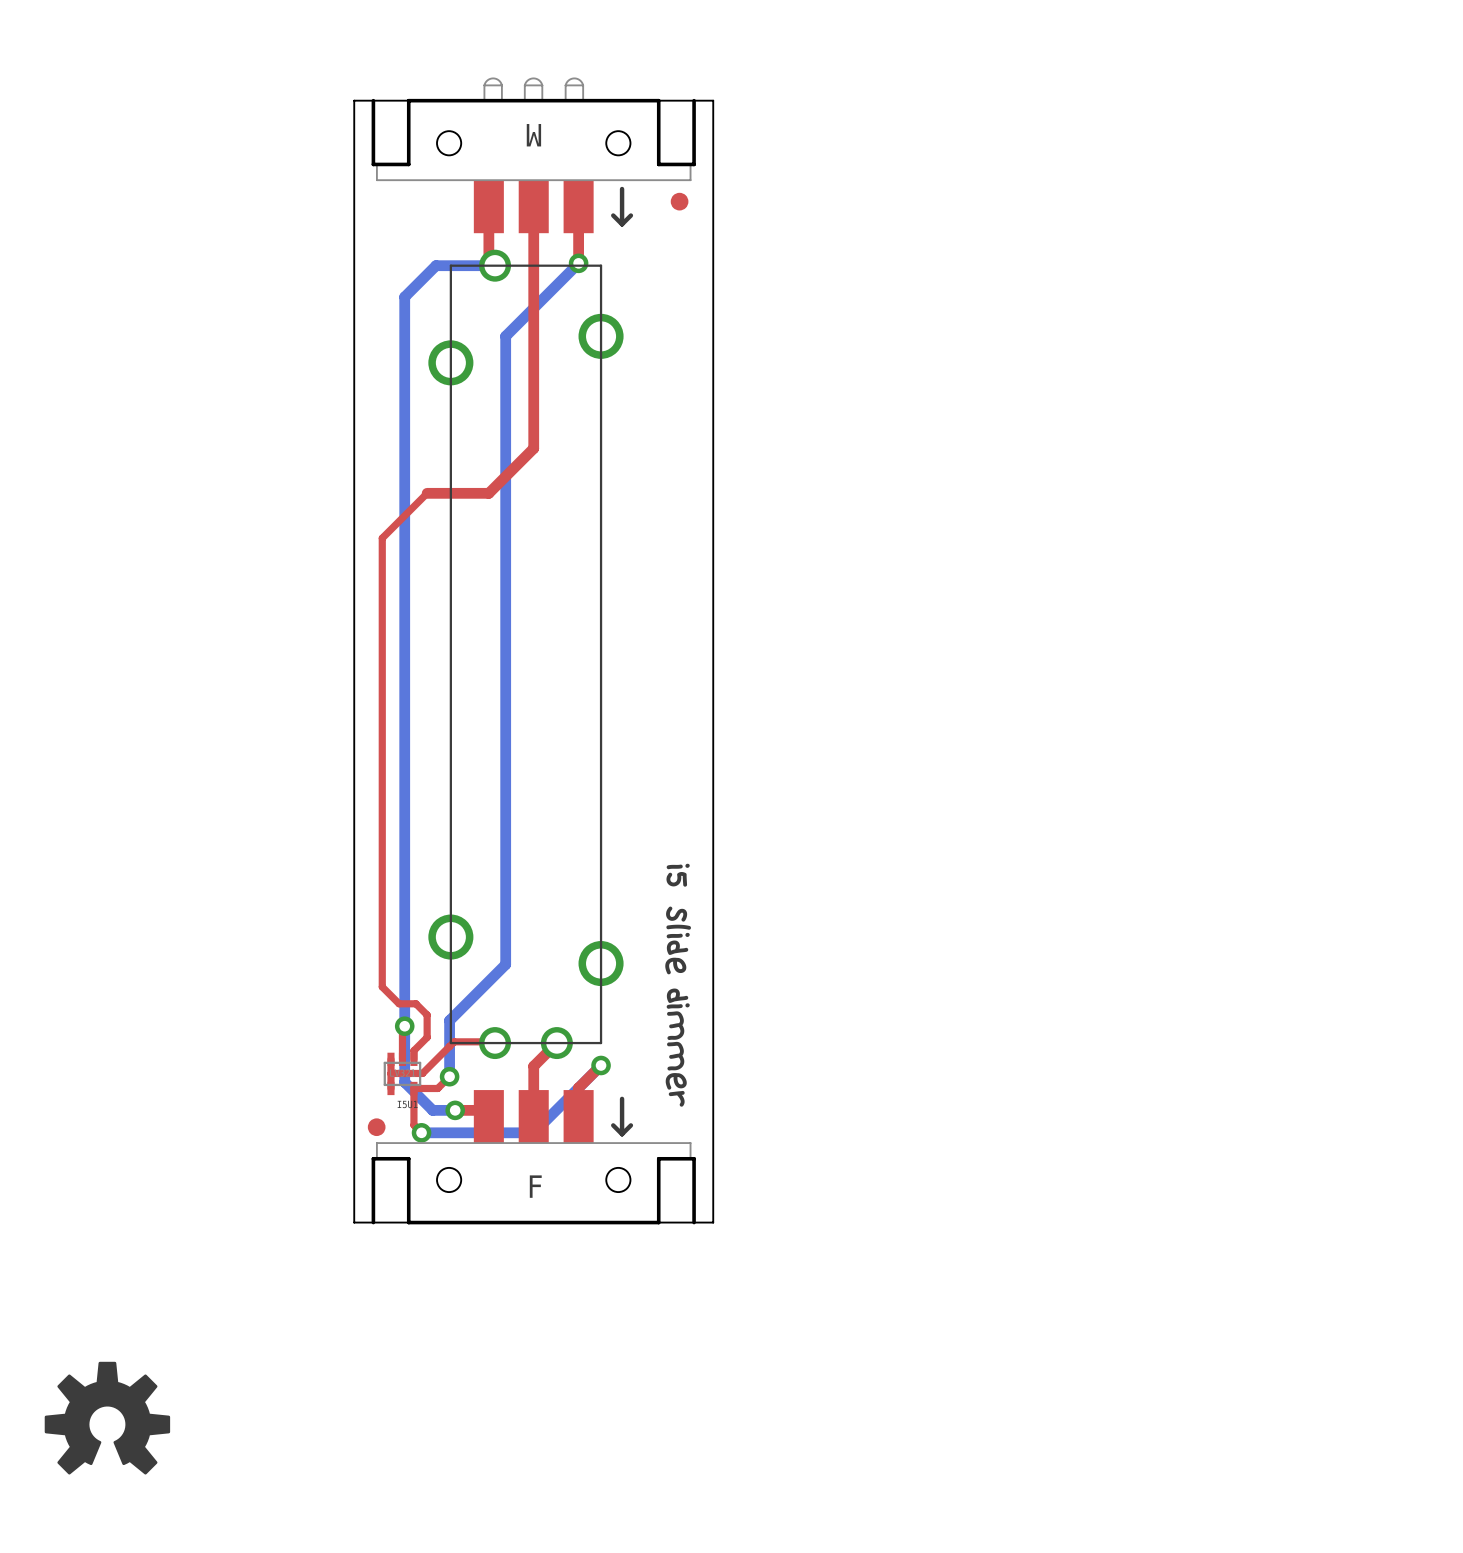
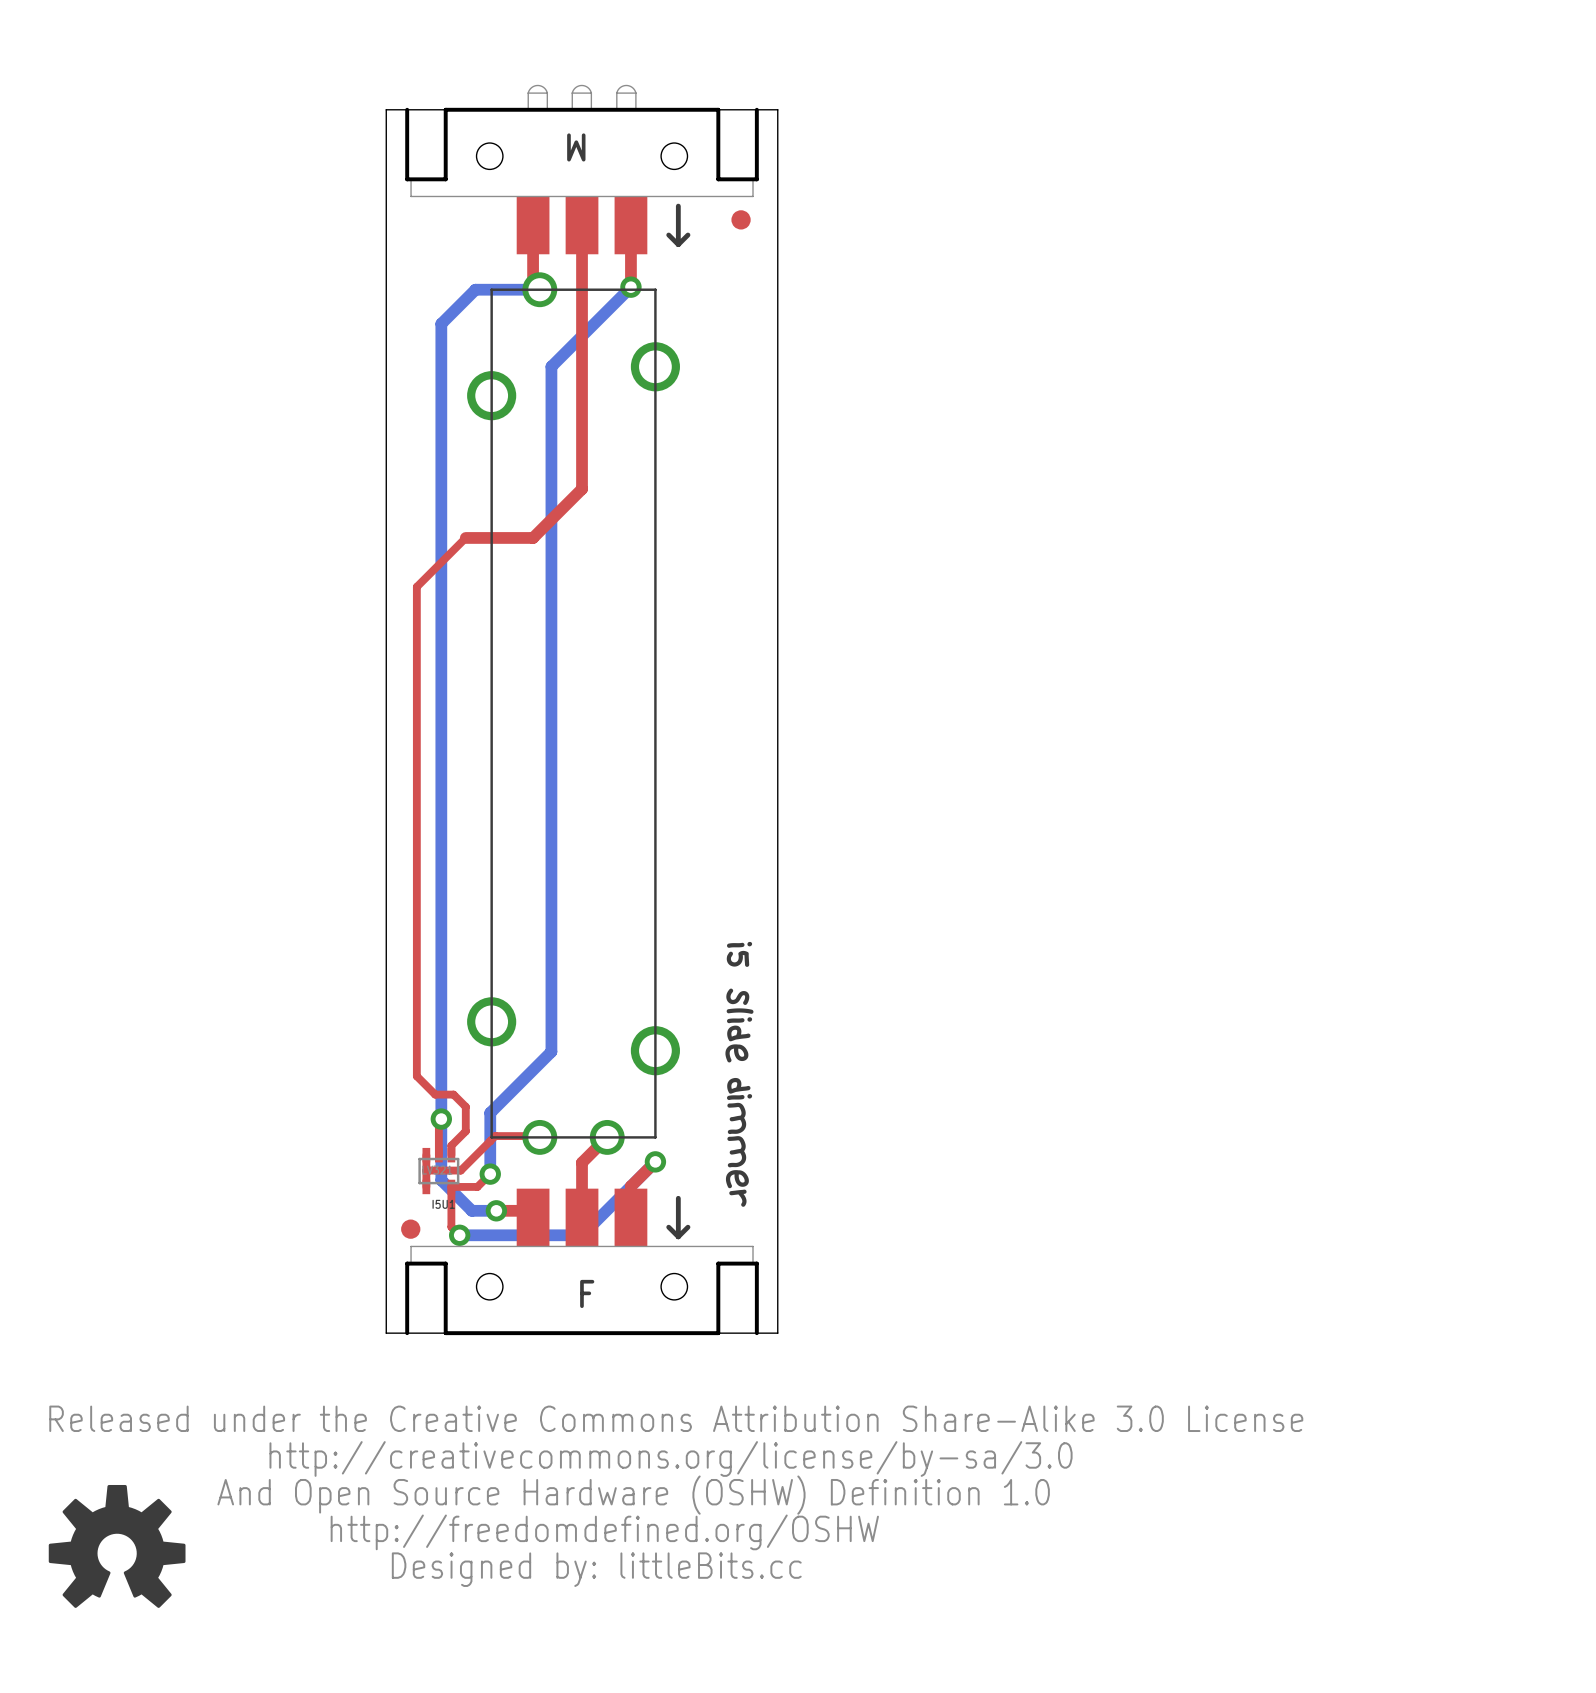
drawing: none -> [49, 1405, 1304, 1587]

